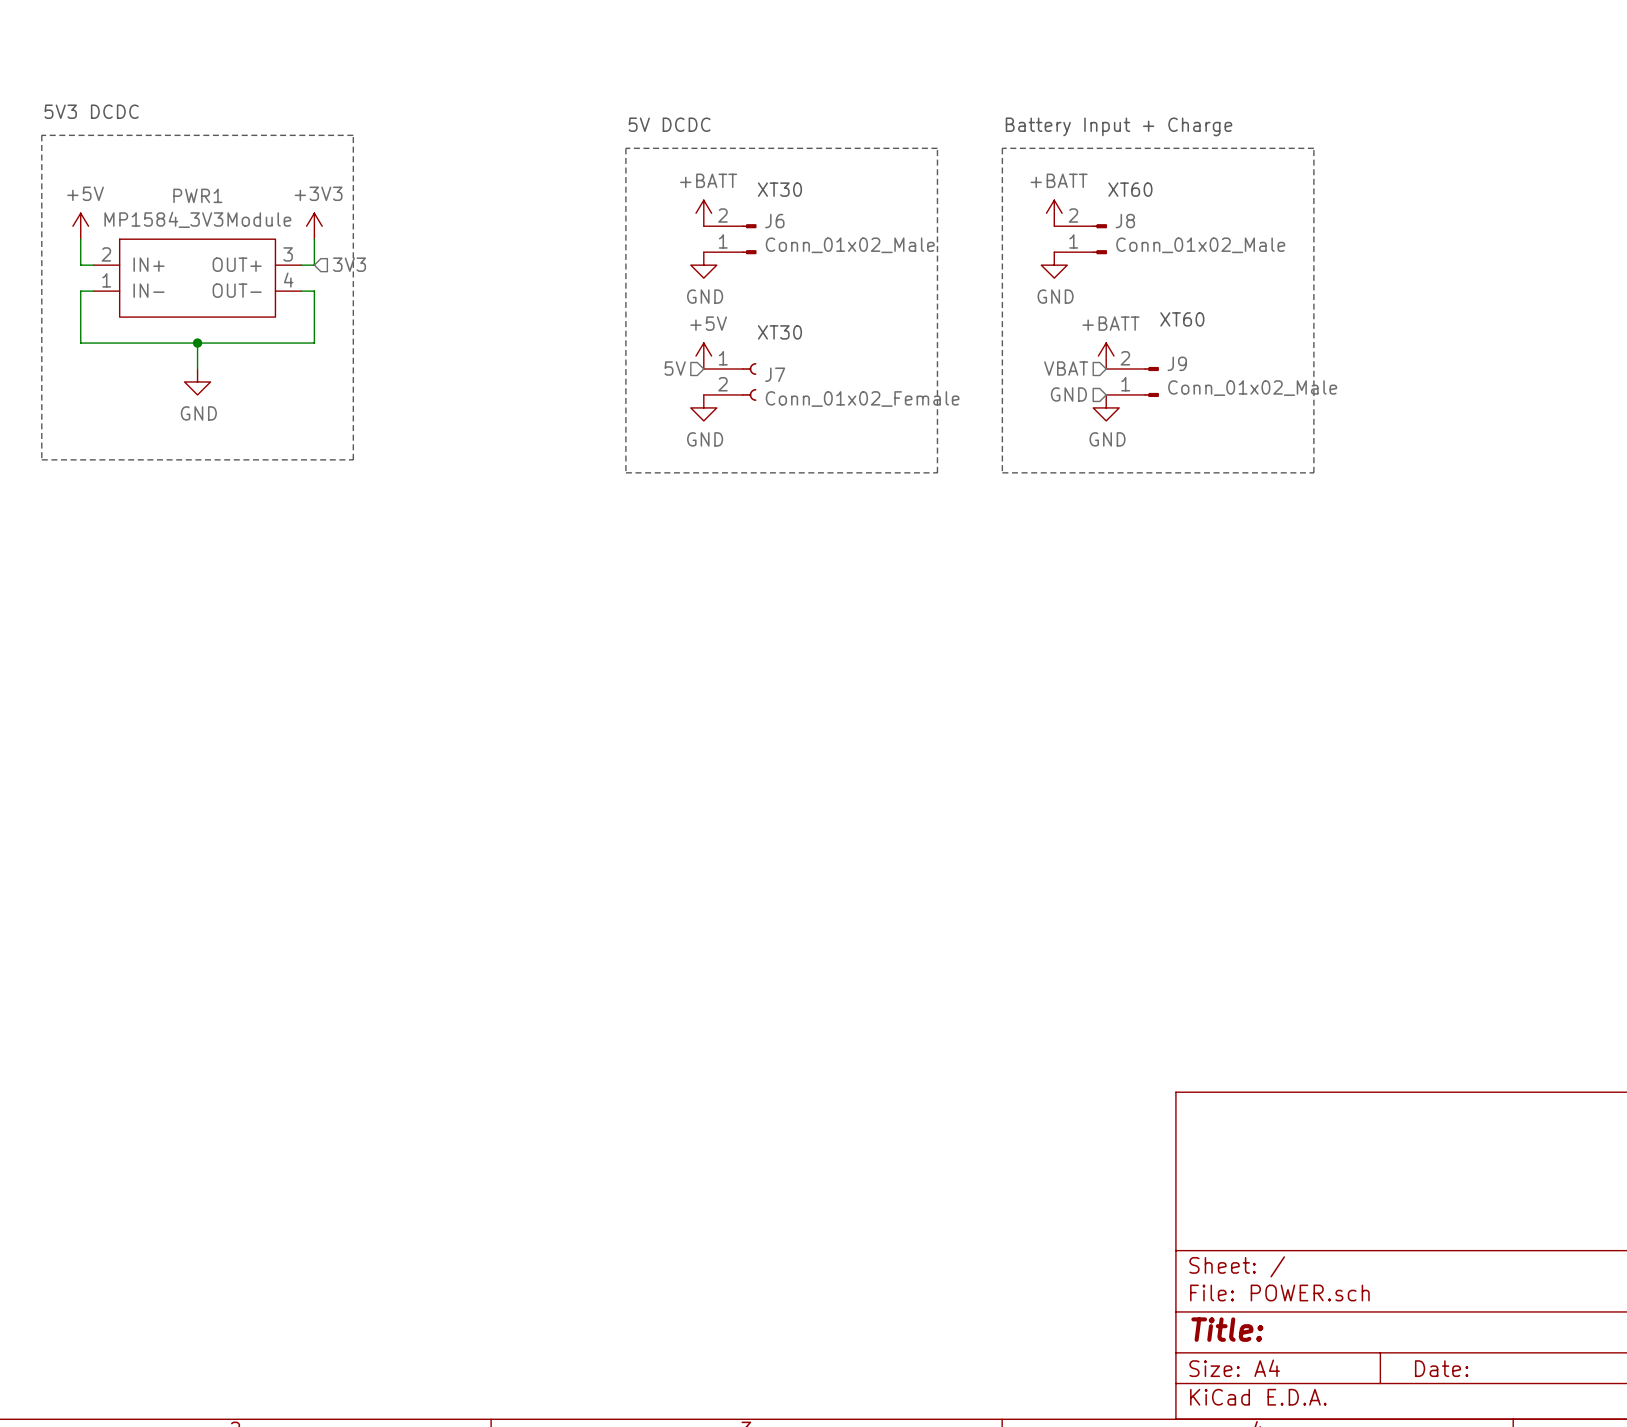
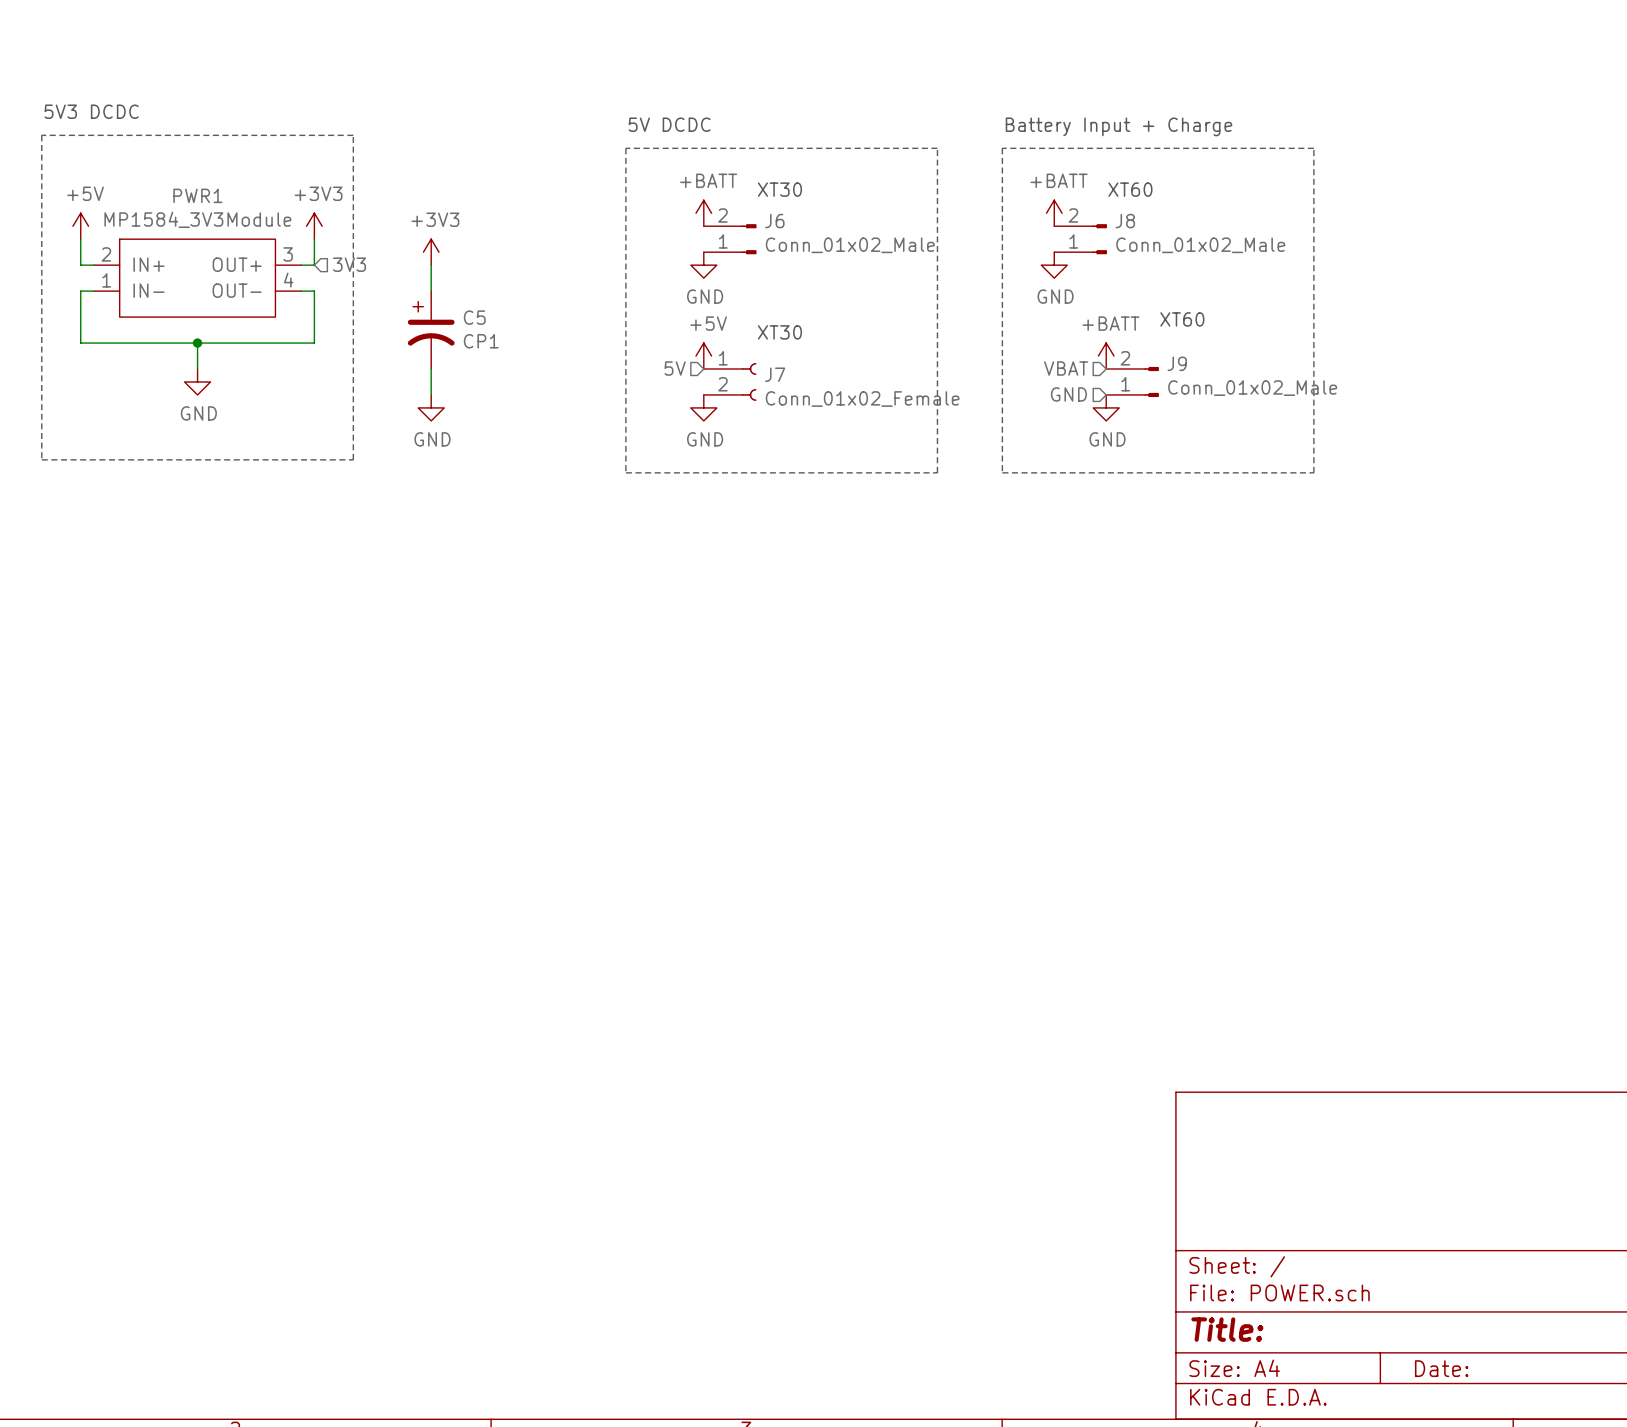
power symbol: none -> +3V3 (431, 252)
wire: none -> (431, 265) (431, 291)
C5: none -> CP1 (431, 330)
wire: none -> (431, 369) (431, 394)
power symbol: none -> GND (431, 407)

